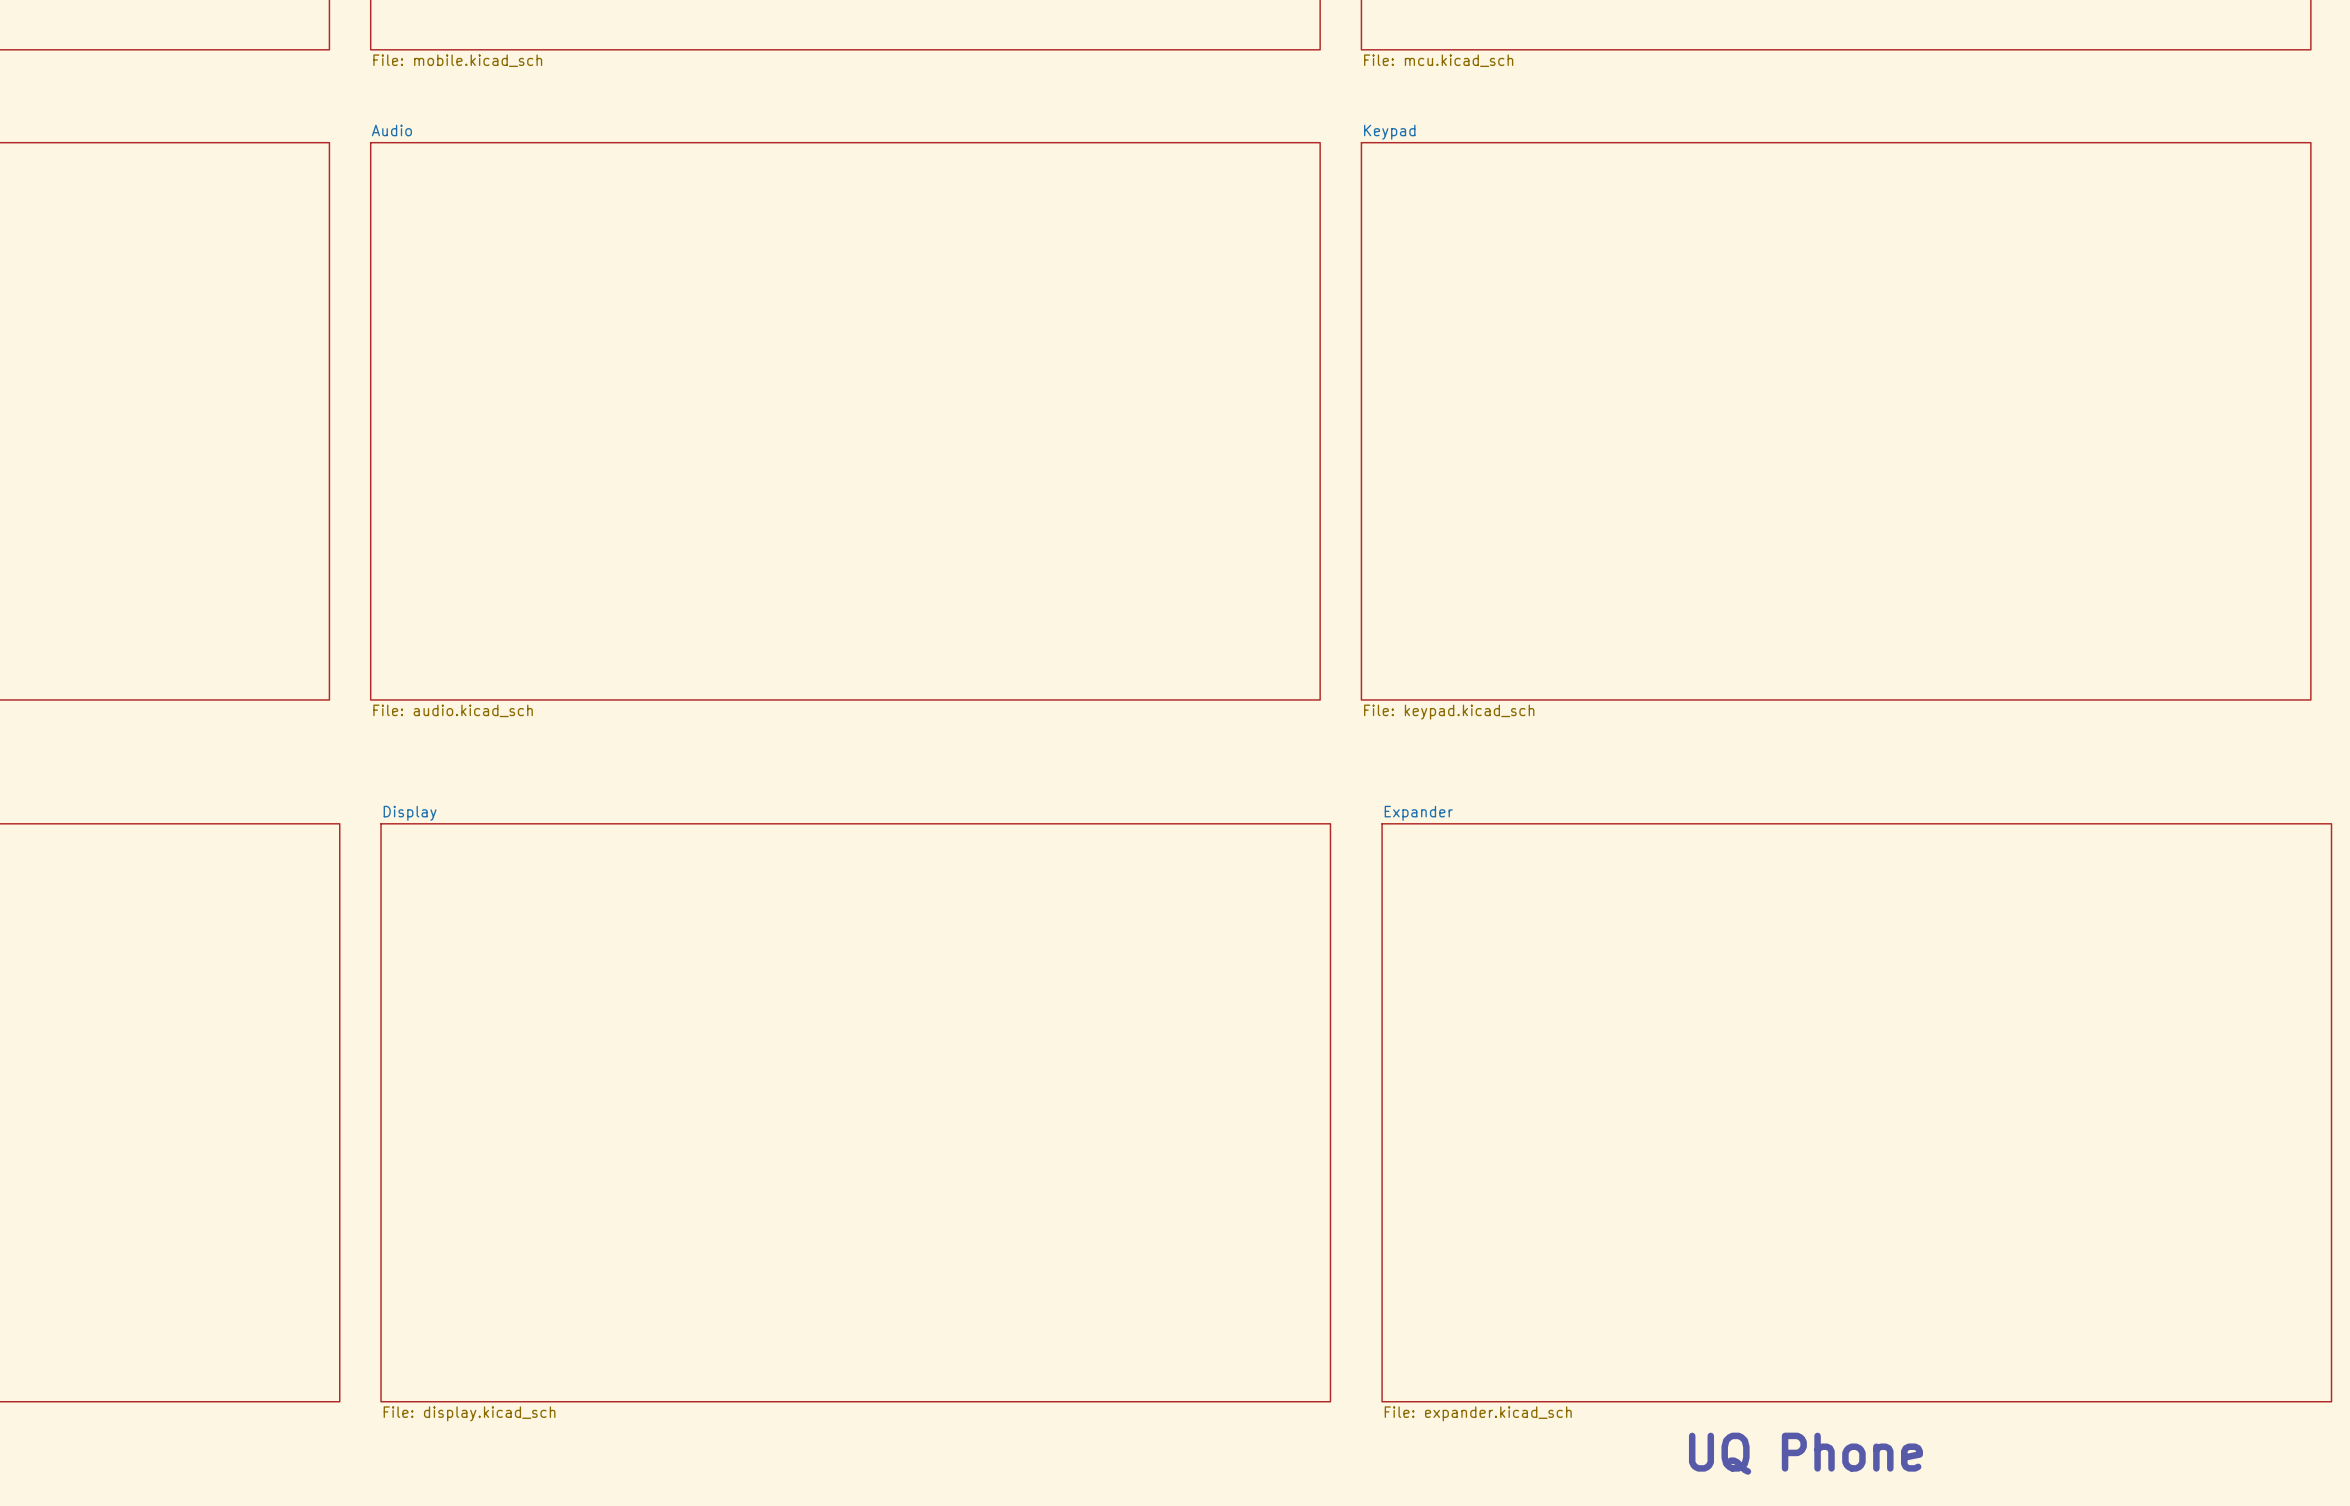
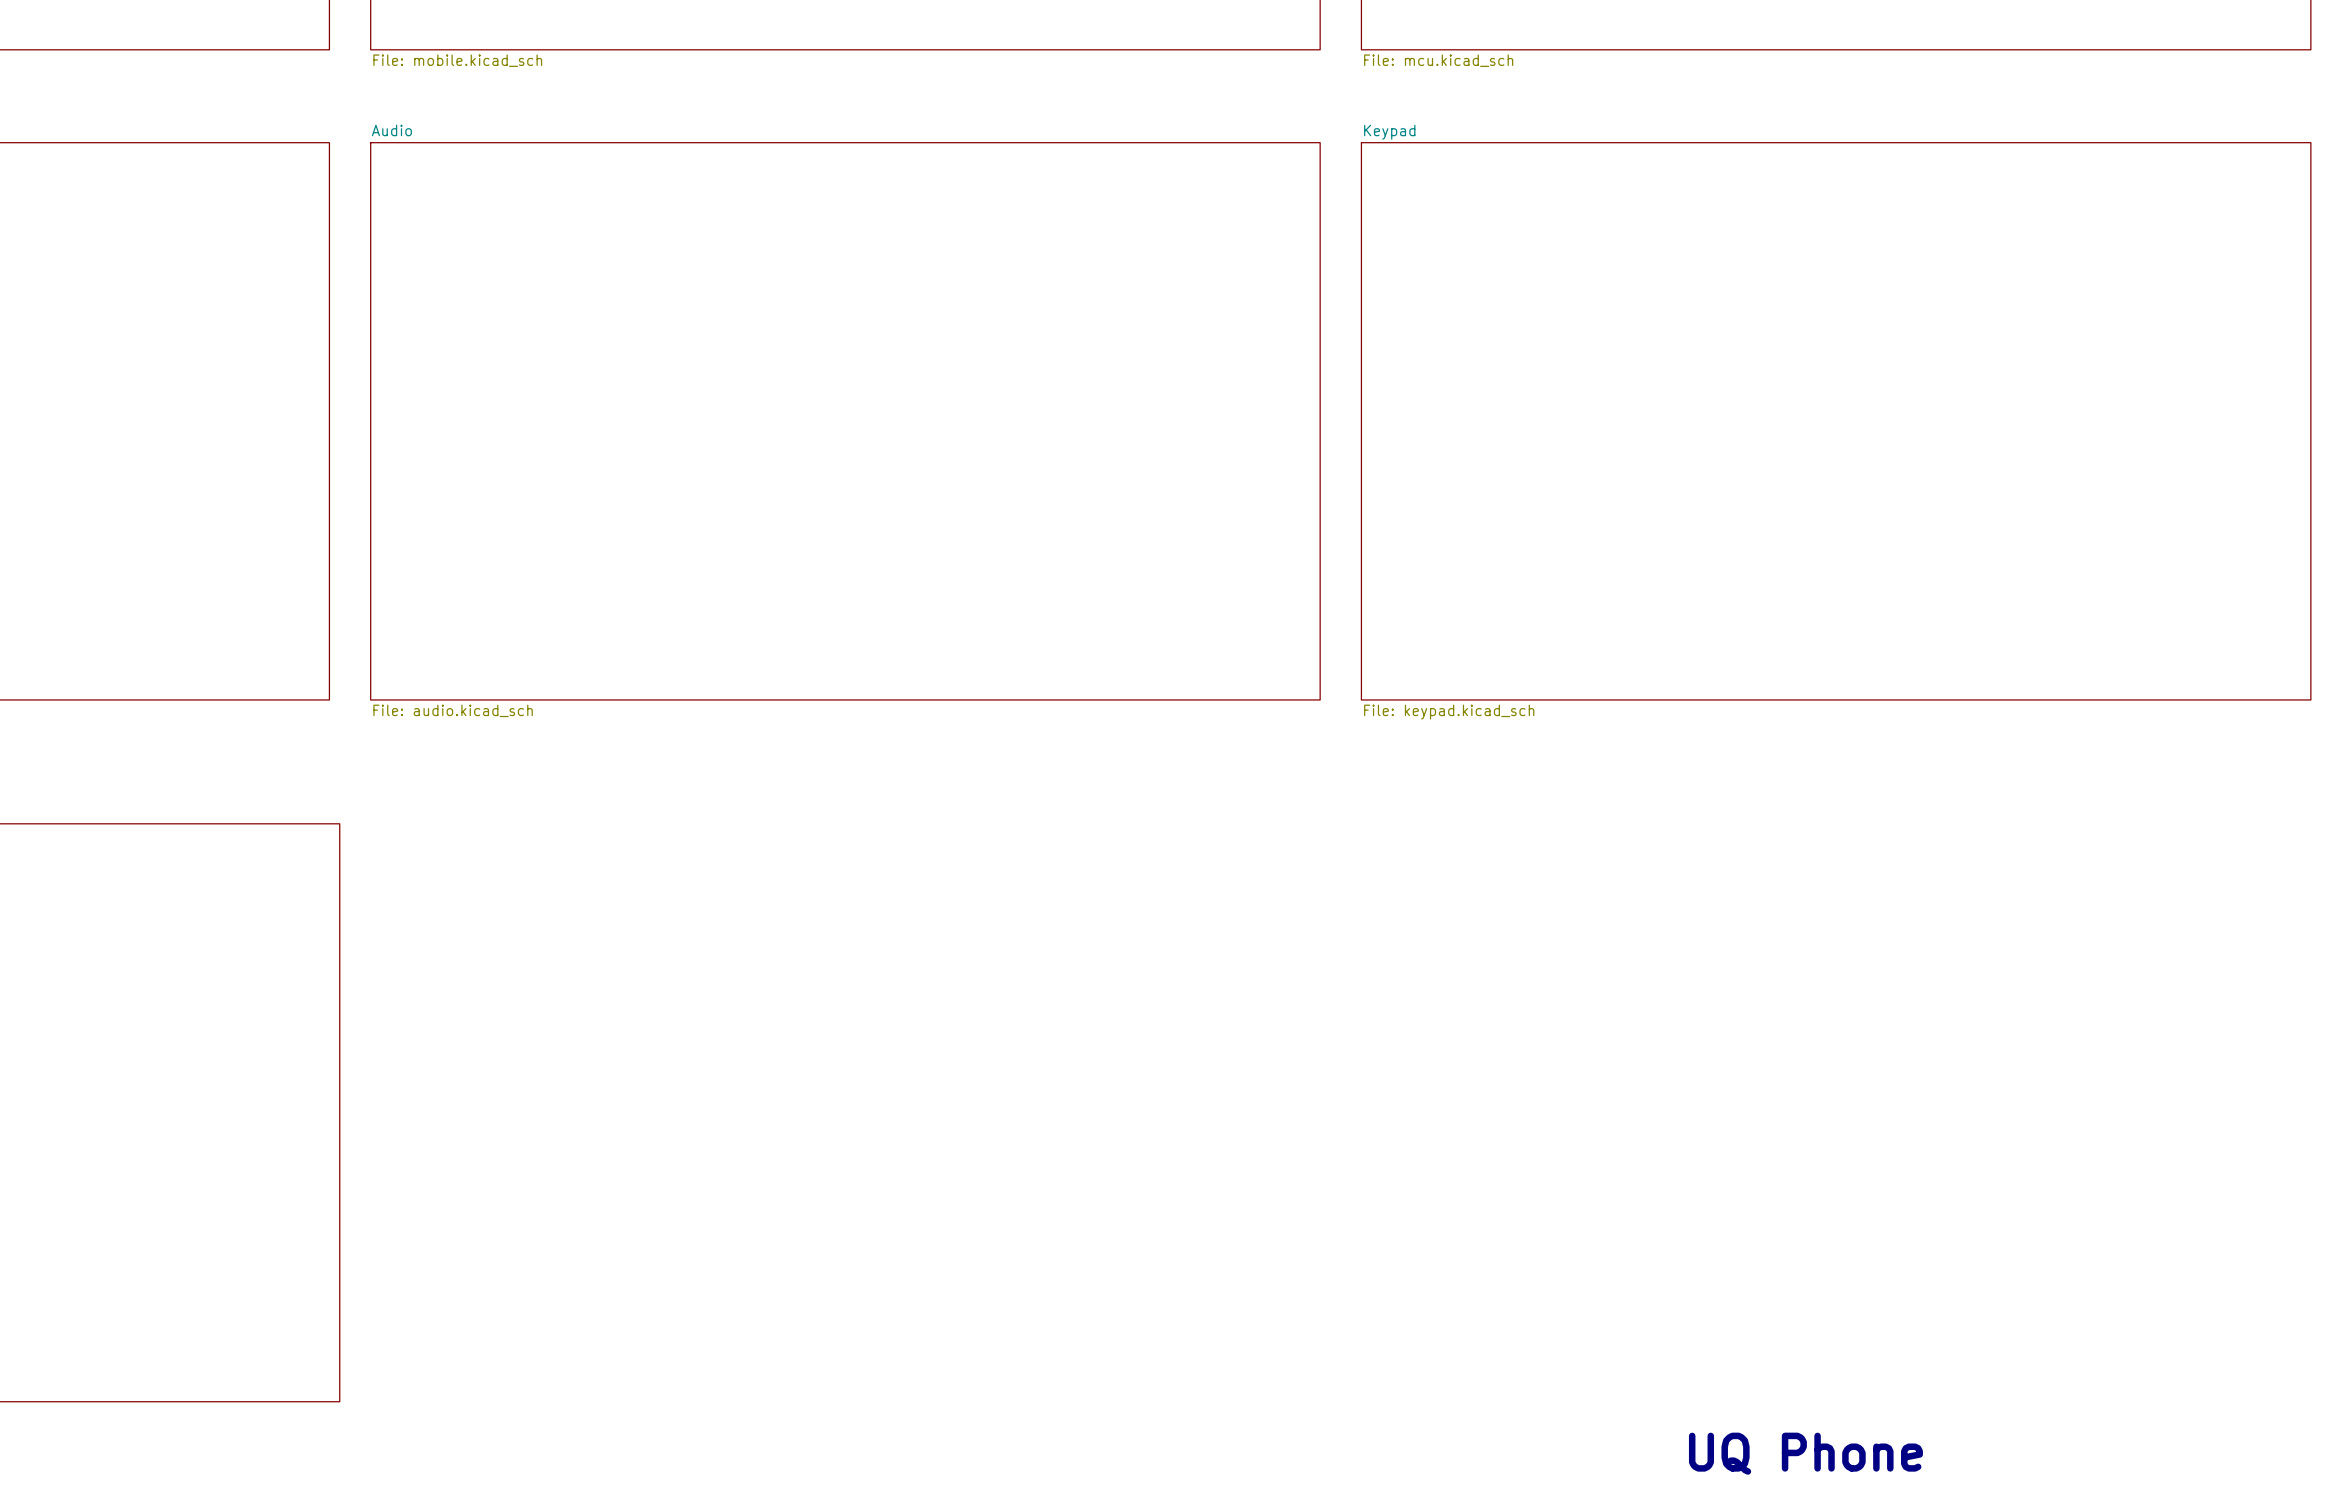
sheet Display: File: display.kicad_sch (855, 1112) -> none
sheet Expander: File: expander.kicad_sch (1856, 1112) -> none

